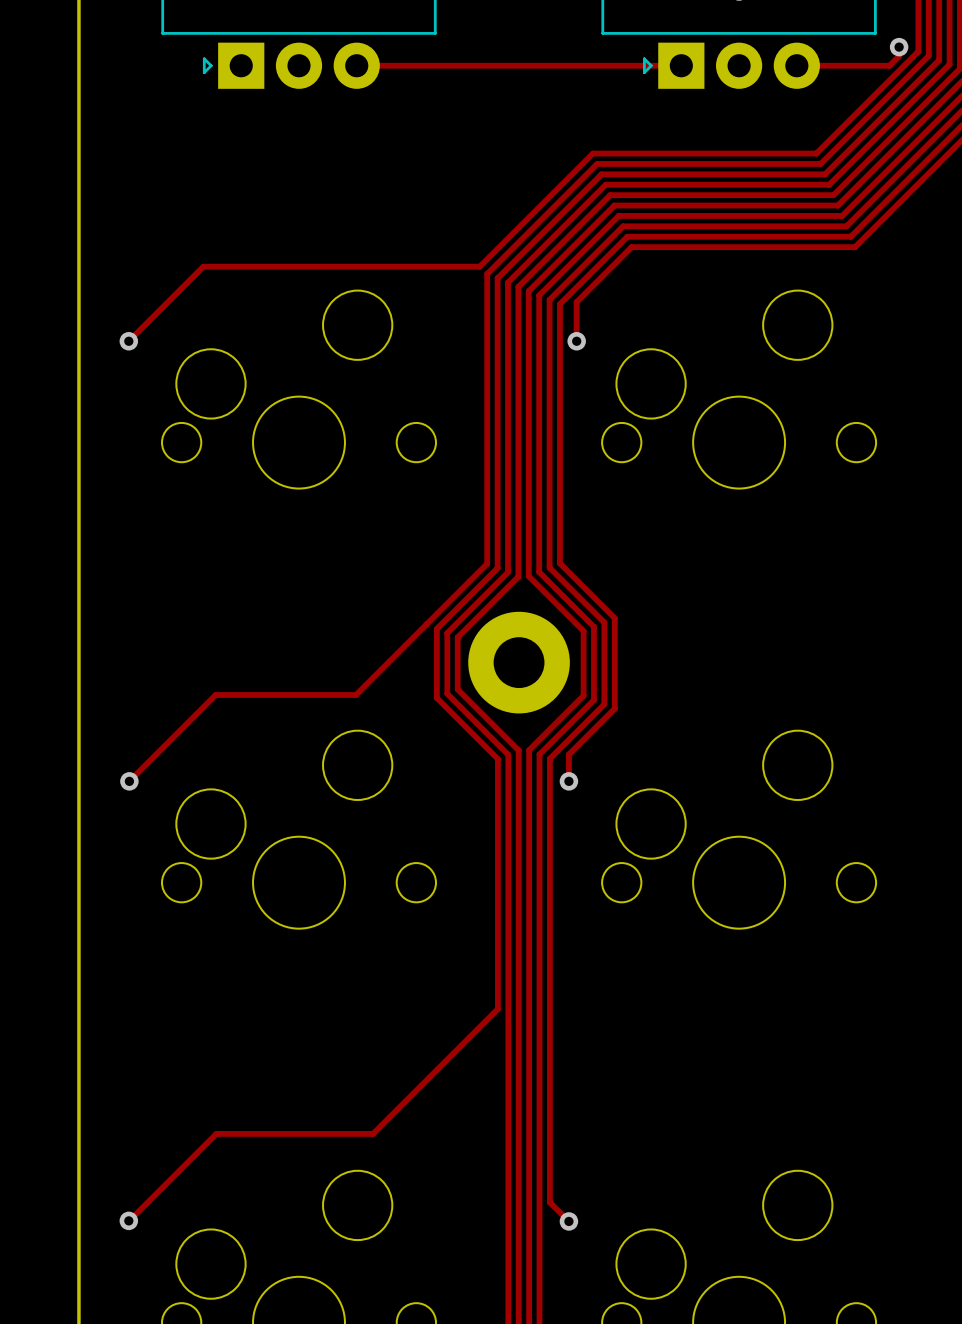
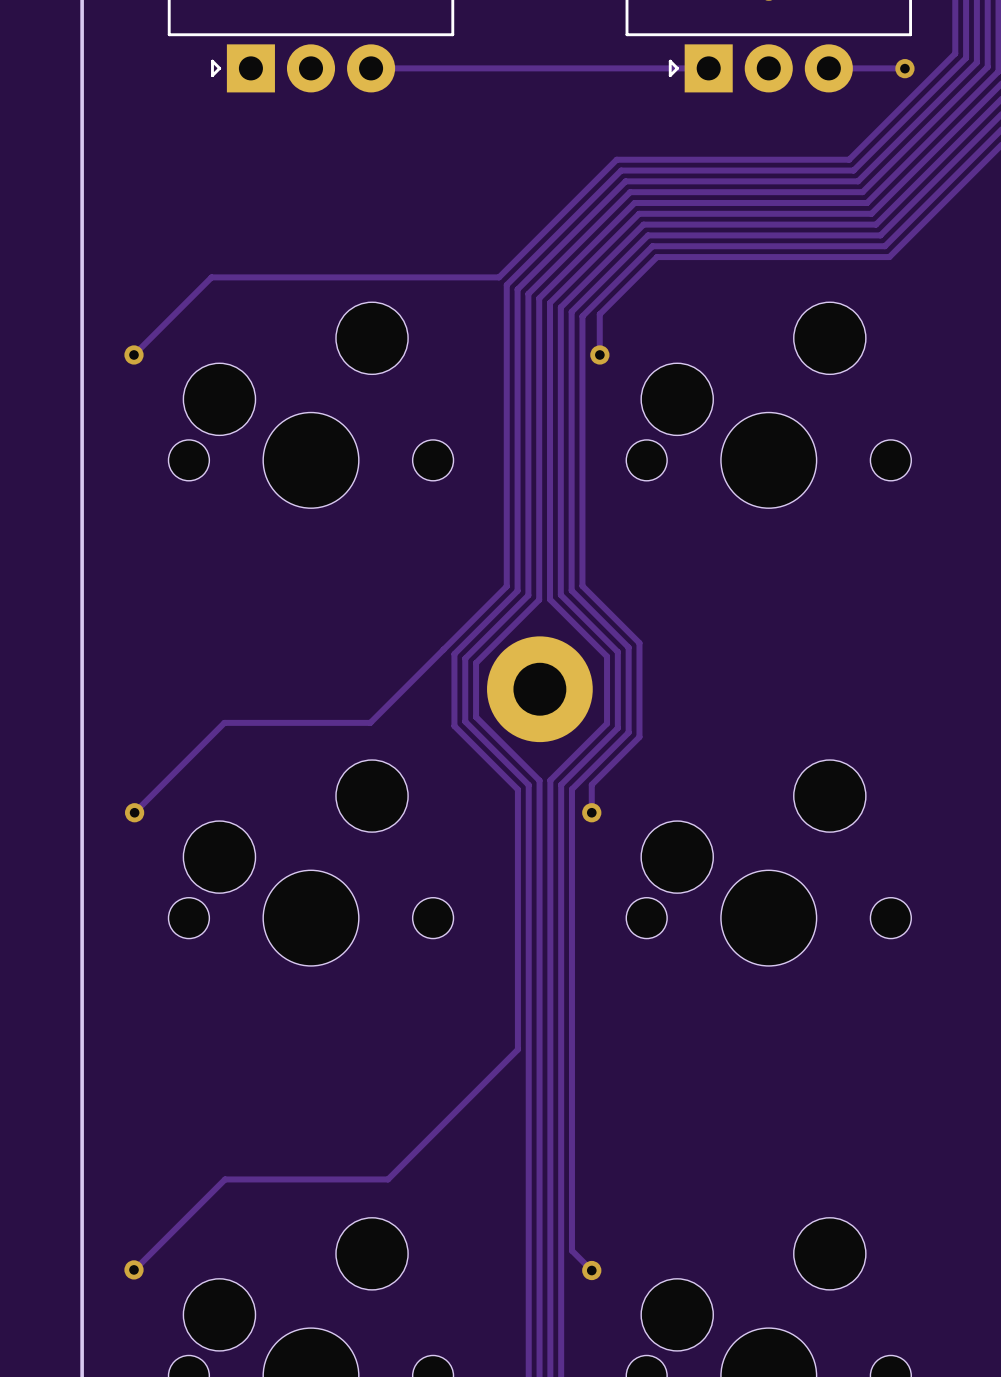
track: (899, 47) (899, 56) (889, 65) (869, 65) -> none
via position: (899, 47) -> (904, 68)

